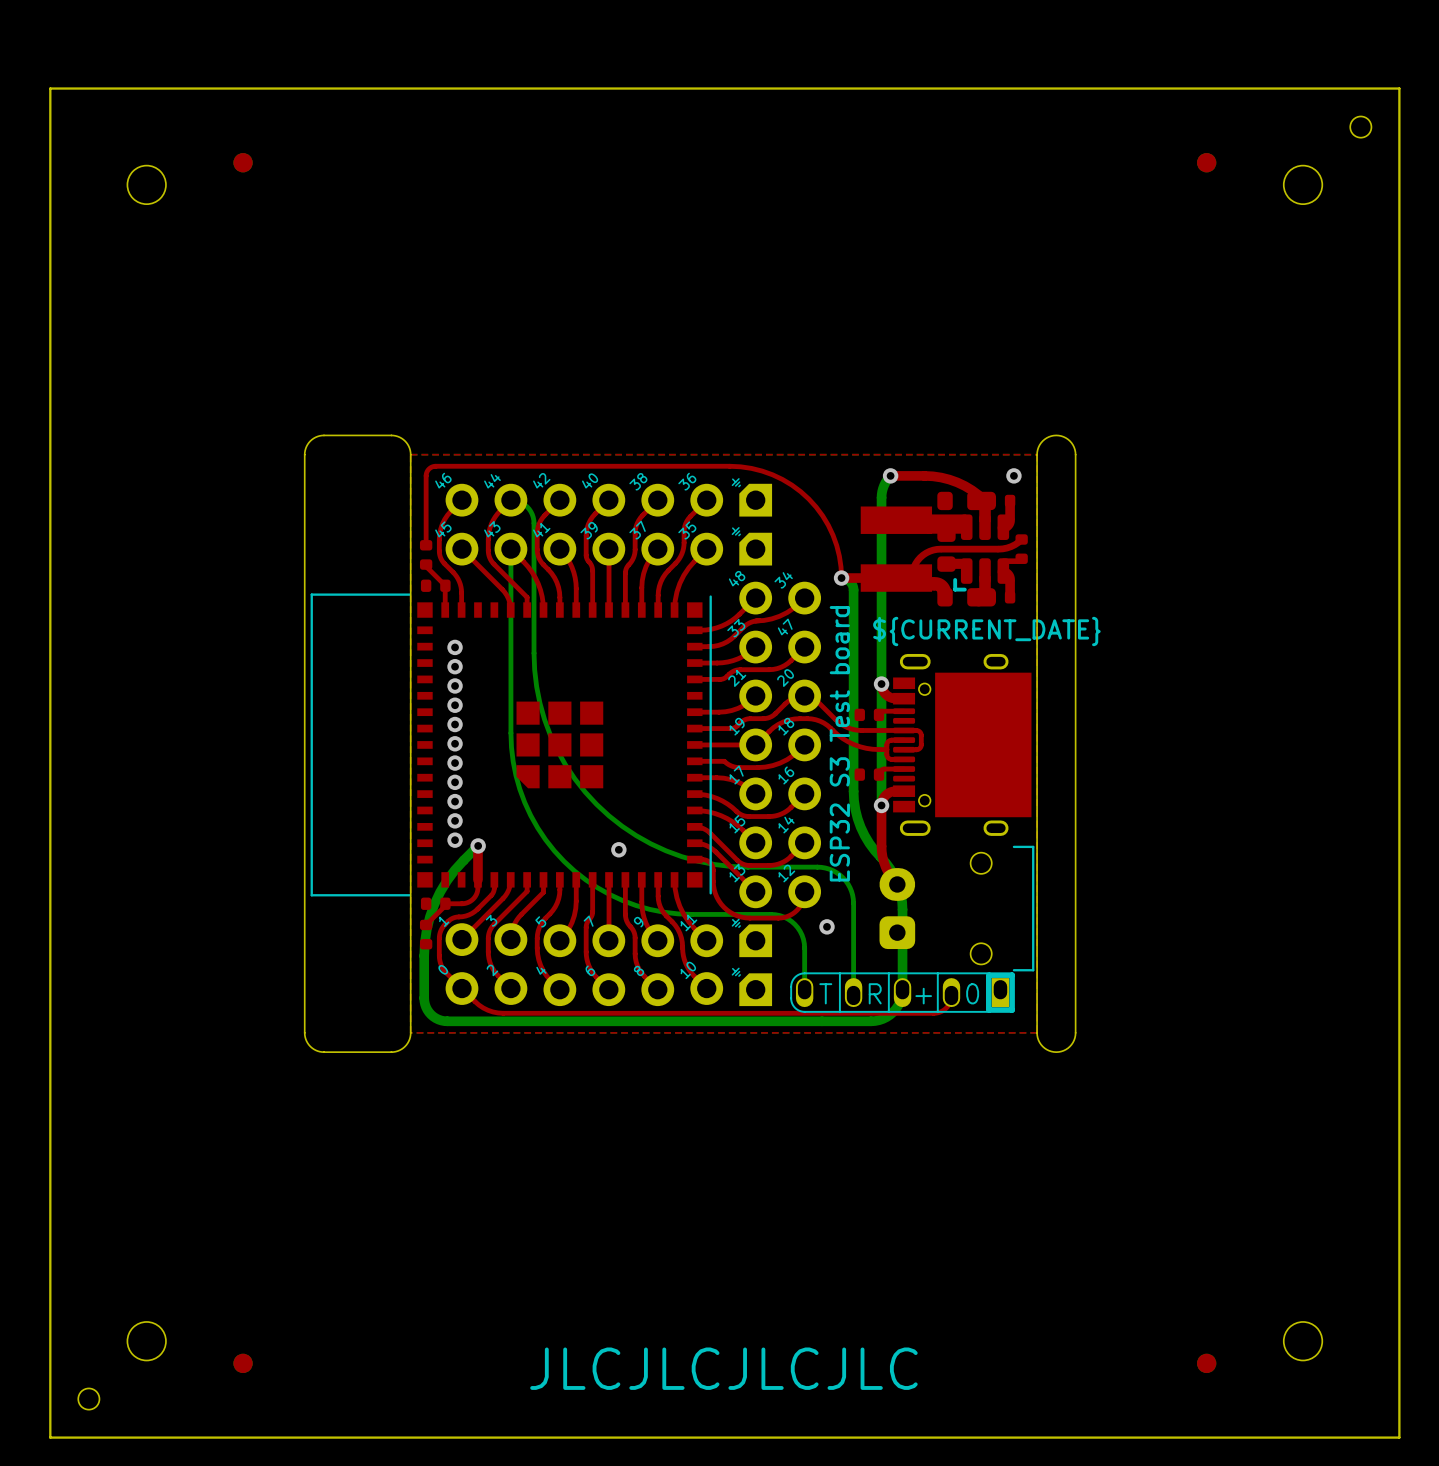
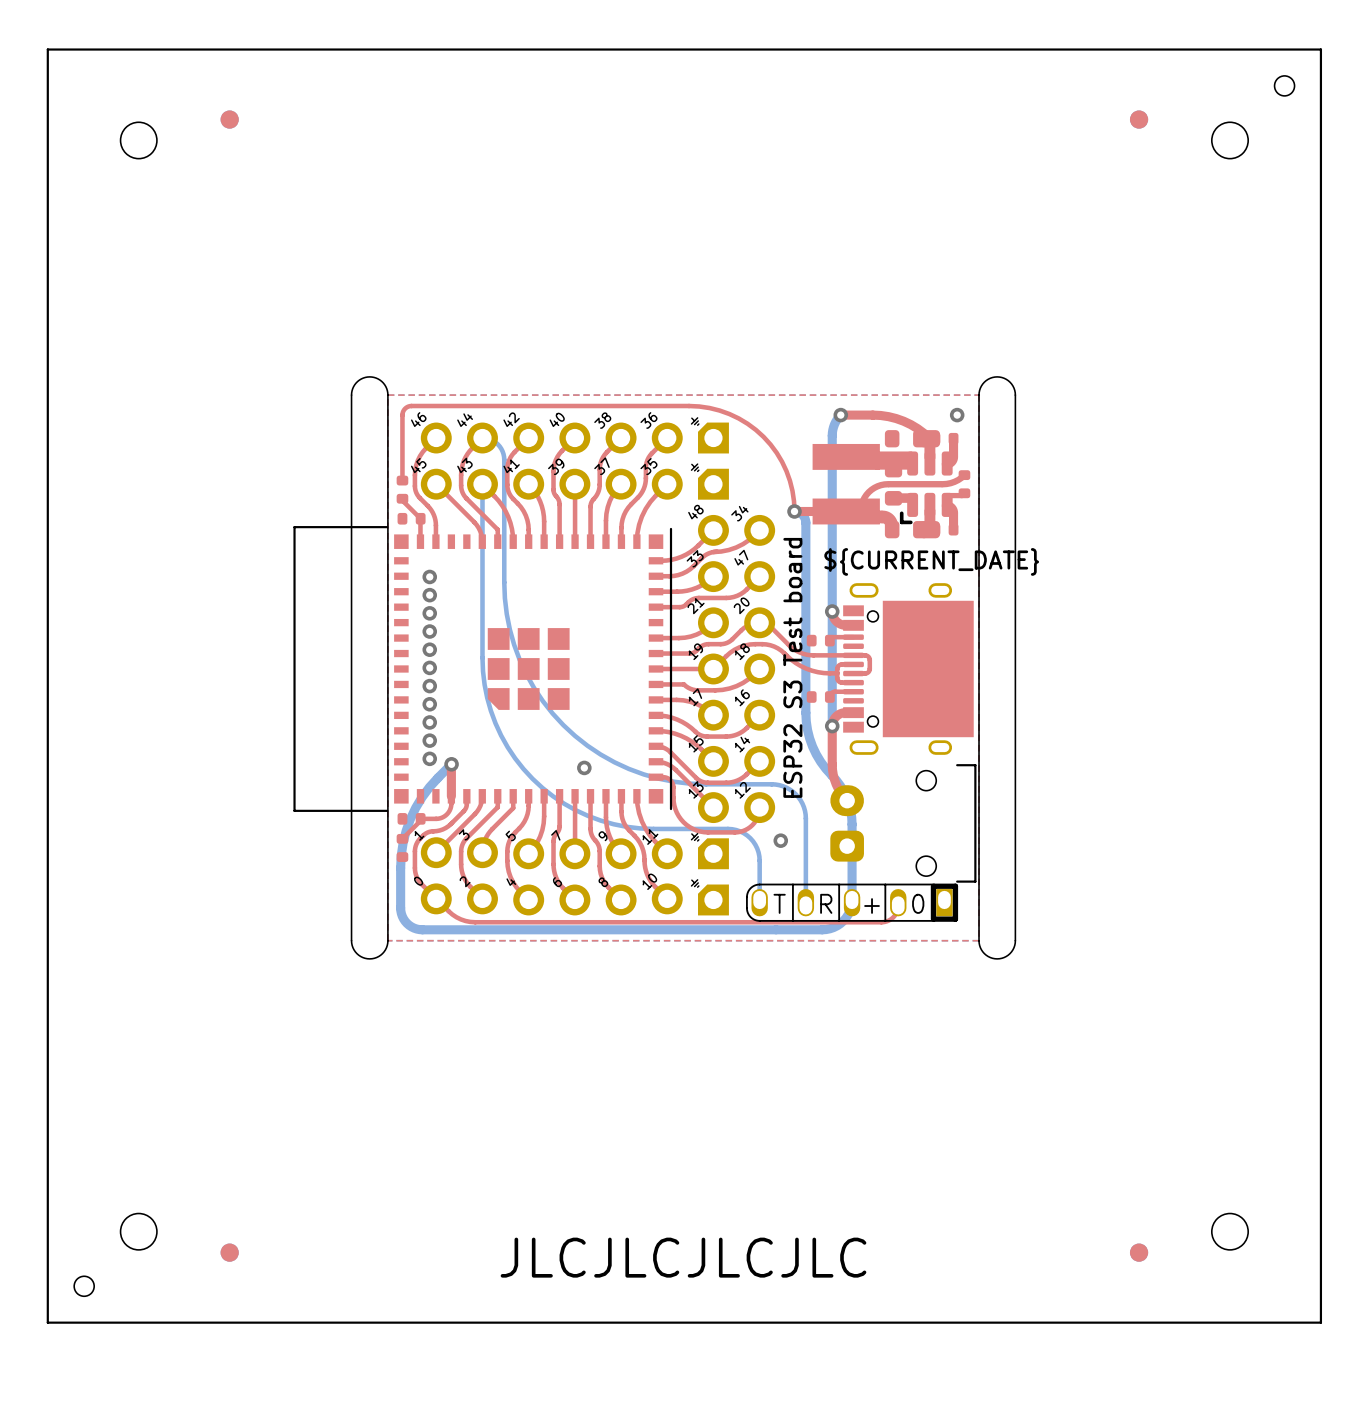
board edge: (410, 454) (405, 441) (391, 435) (319, 435) (308, 442) (304, 454) (305, 1037) (310, 1046) (319, 1051) (391, 1052) (405, 1046) (410, 1032) -> (387, 395) (383, 383) (376, 378) (369, 376) (357, 381) (353, 386) (351, 395) (351, 943) (358, 955) (372, 958) (382, 953) (387, 940)

